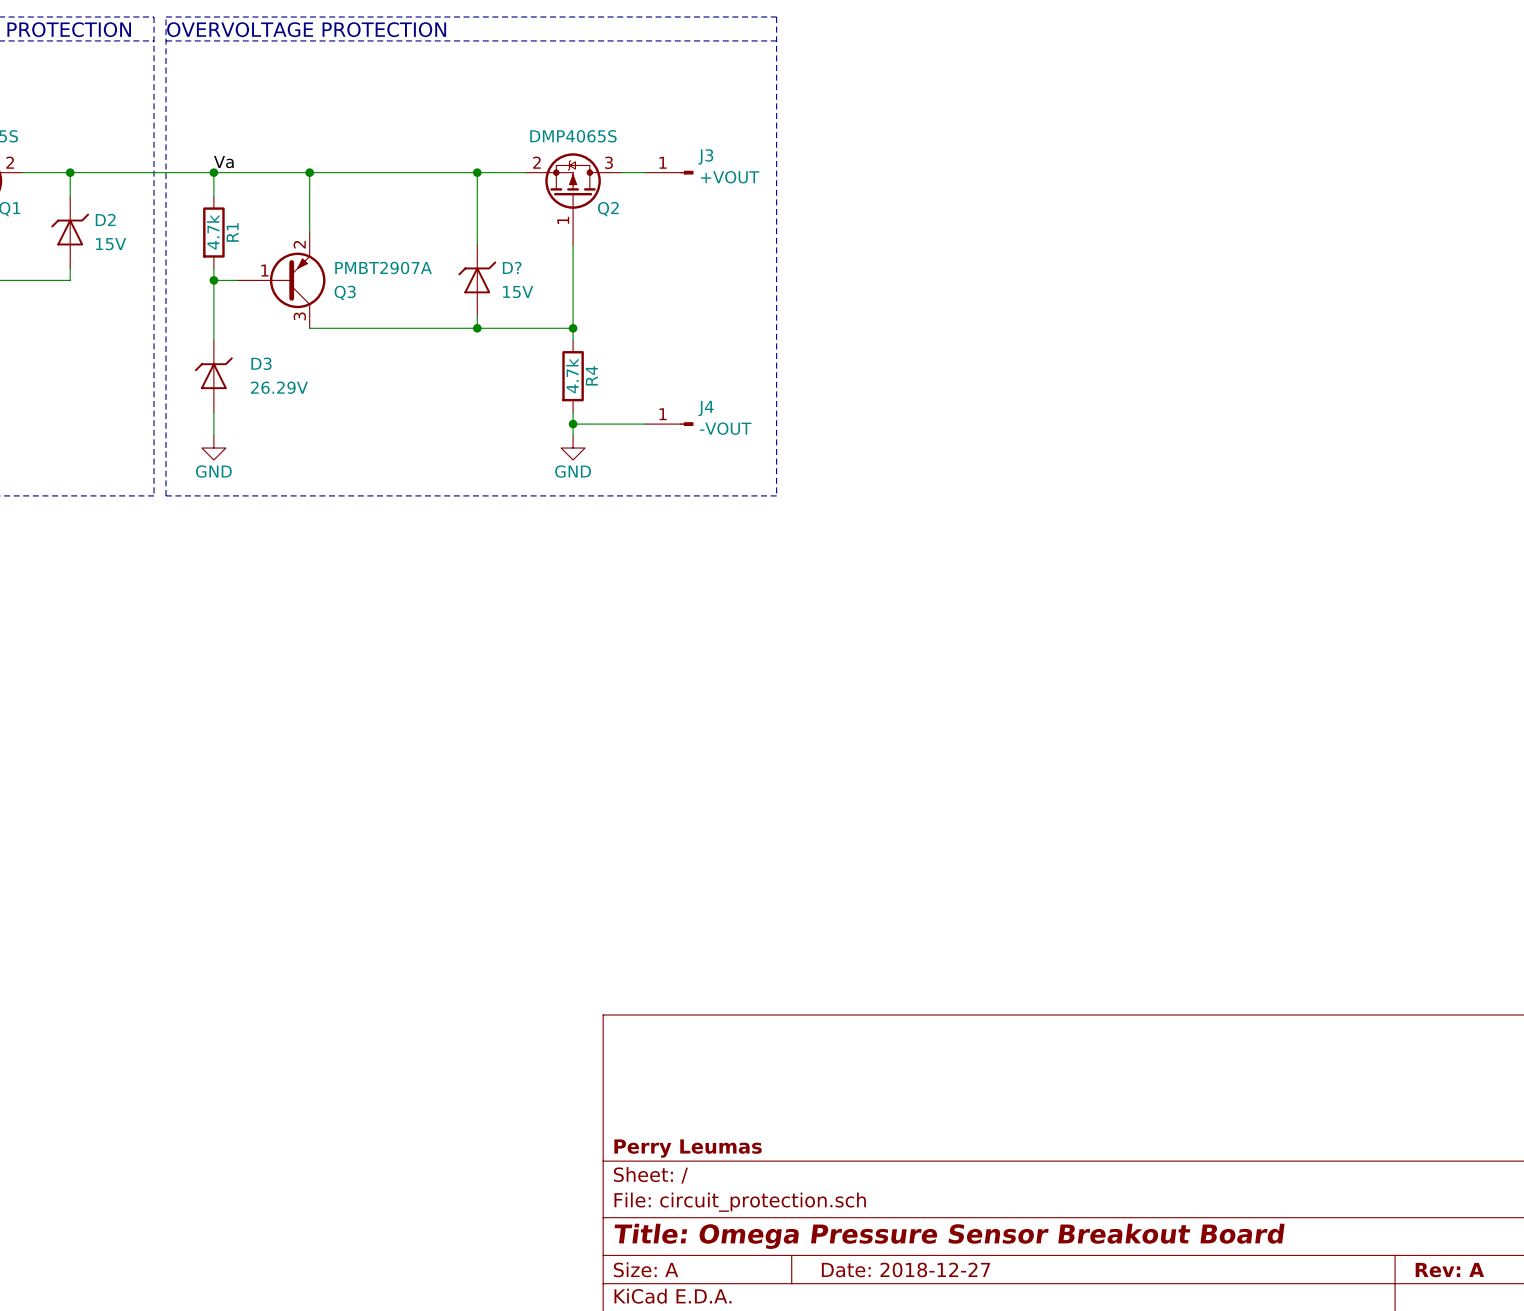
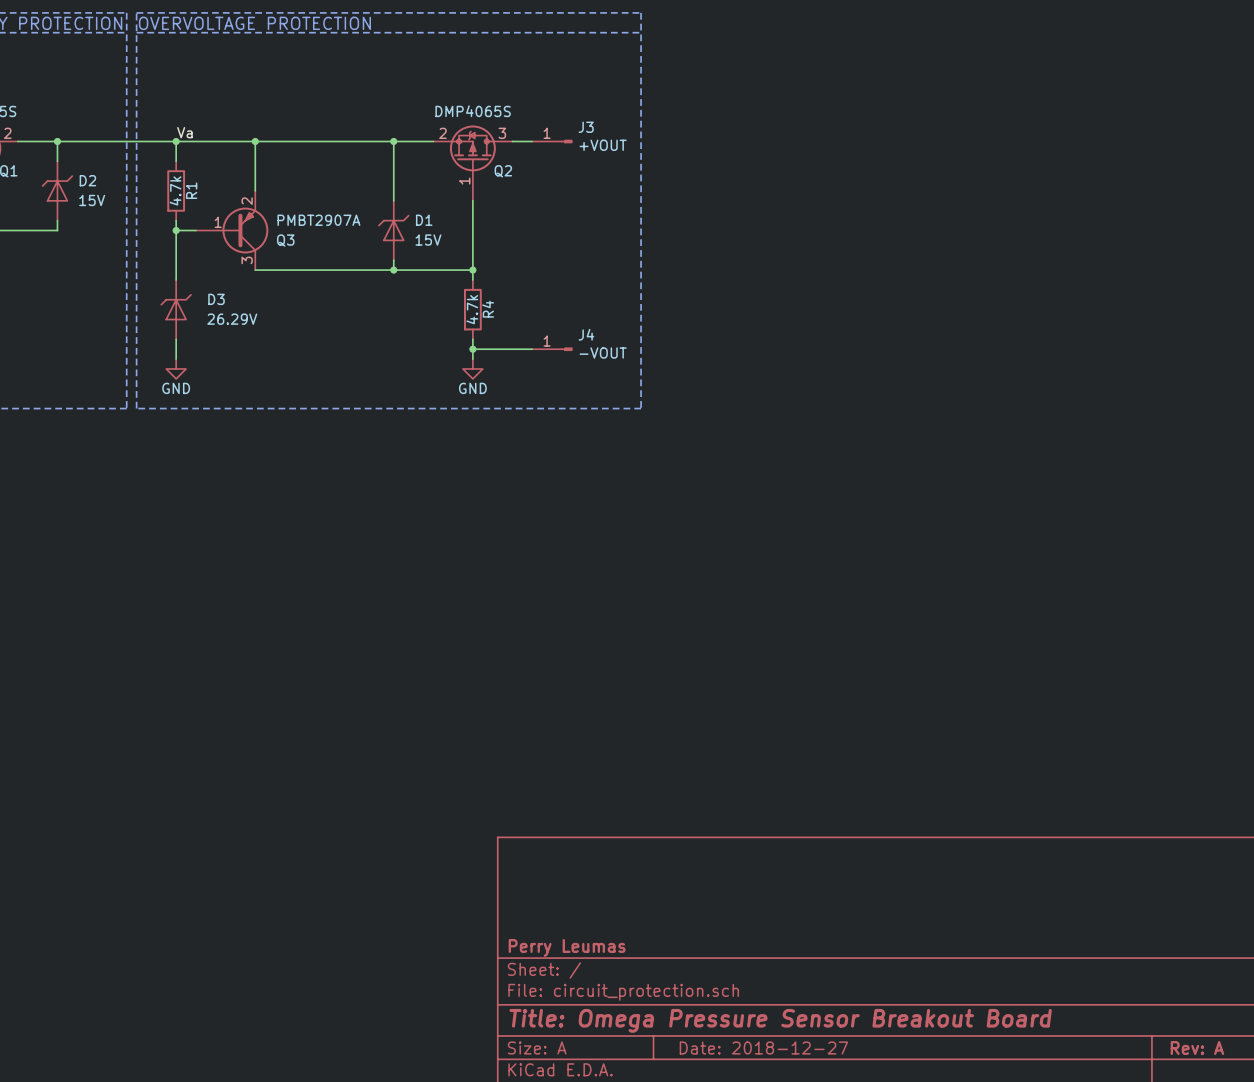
D? name: D? (512, 267) -> D1 (424, 220)

